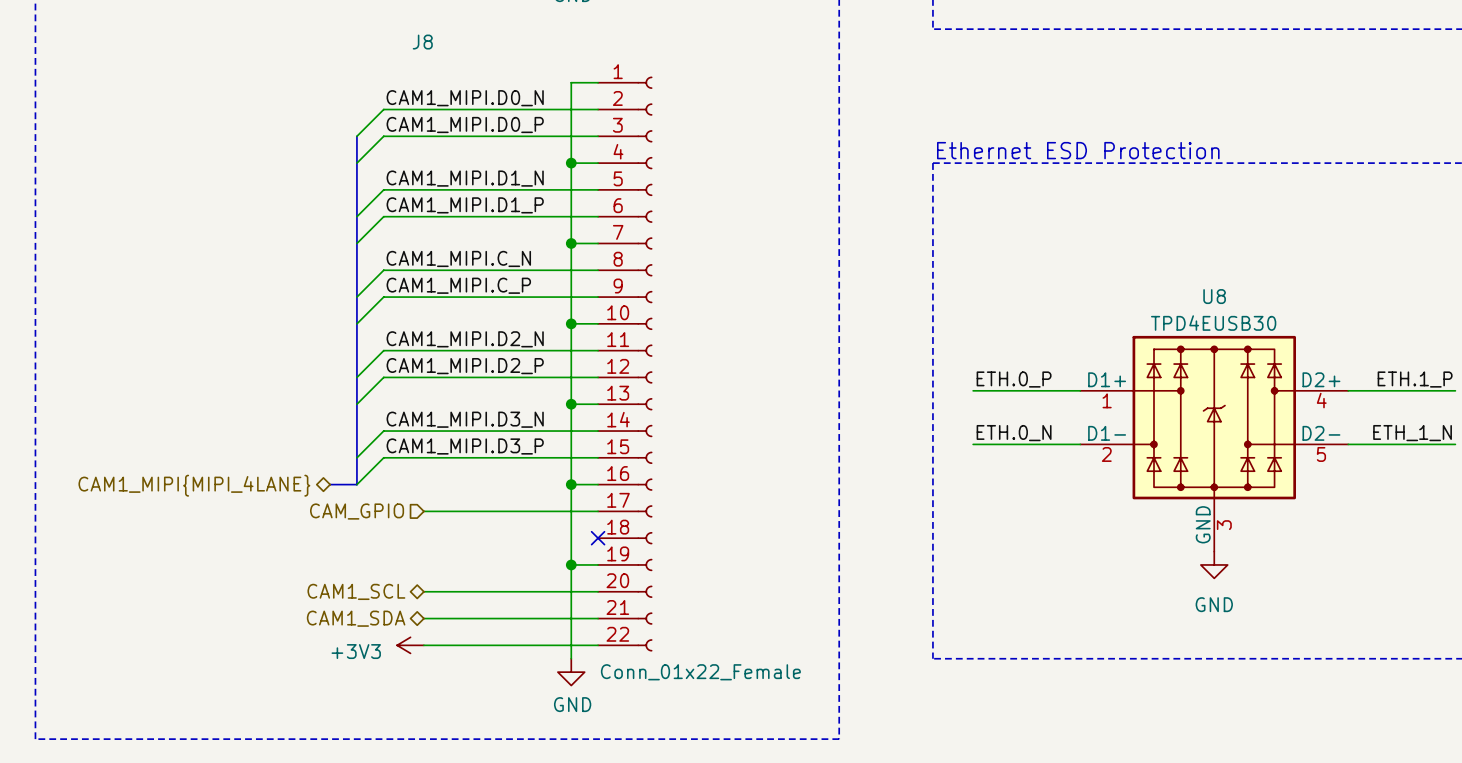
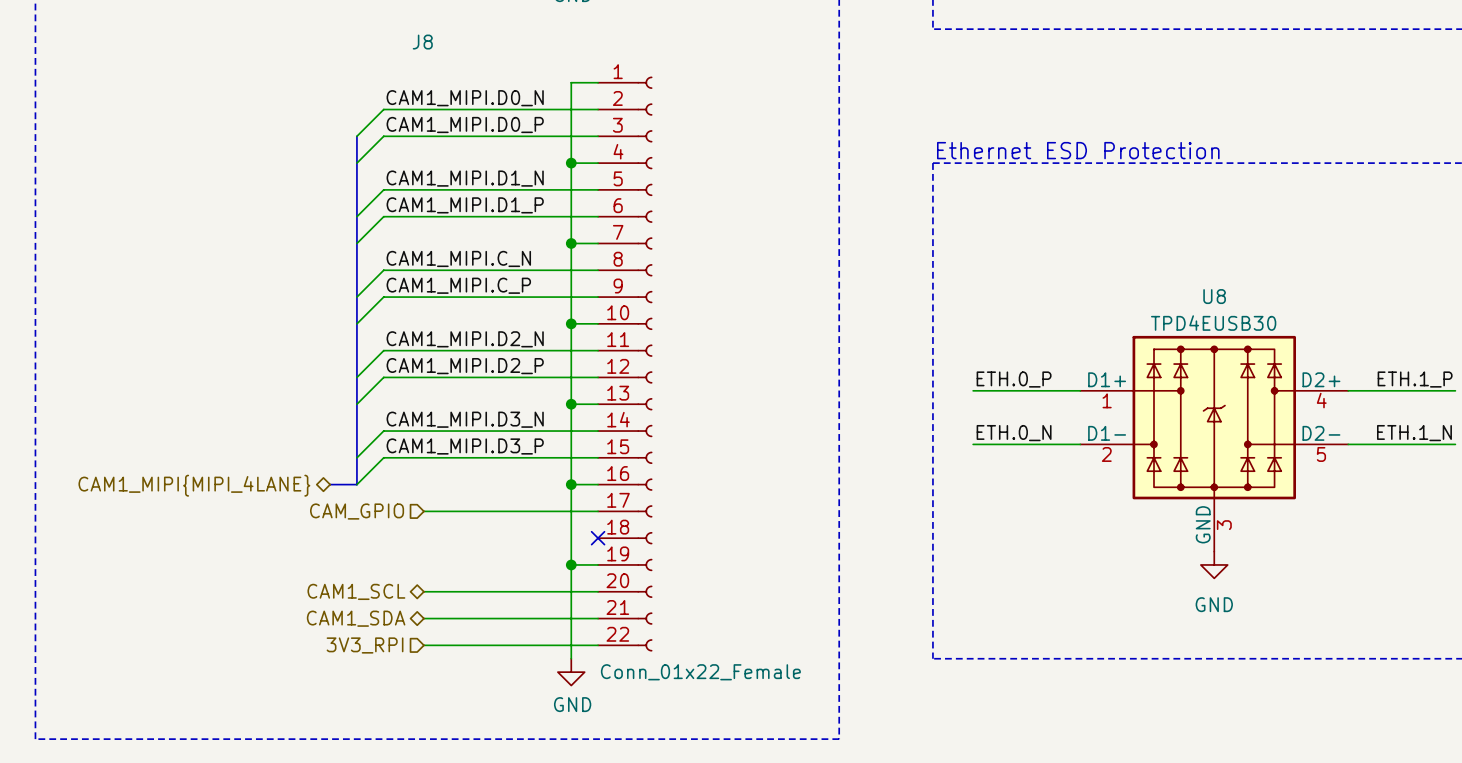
label: ETH_1_N (1412, 433) -> ETH.1_N (1414, 433)
hierarchical label: none -> 3V3_RPI (365, 645)
power symbol: +3V3 (410, 645) -> none

